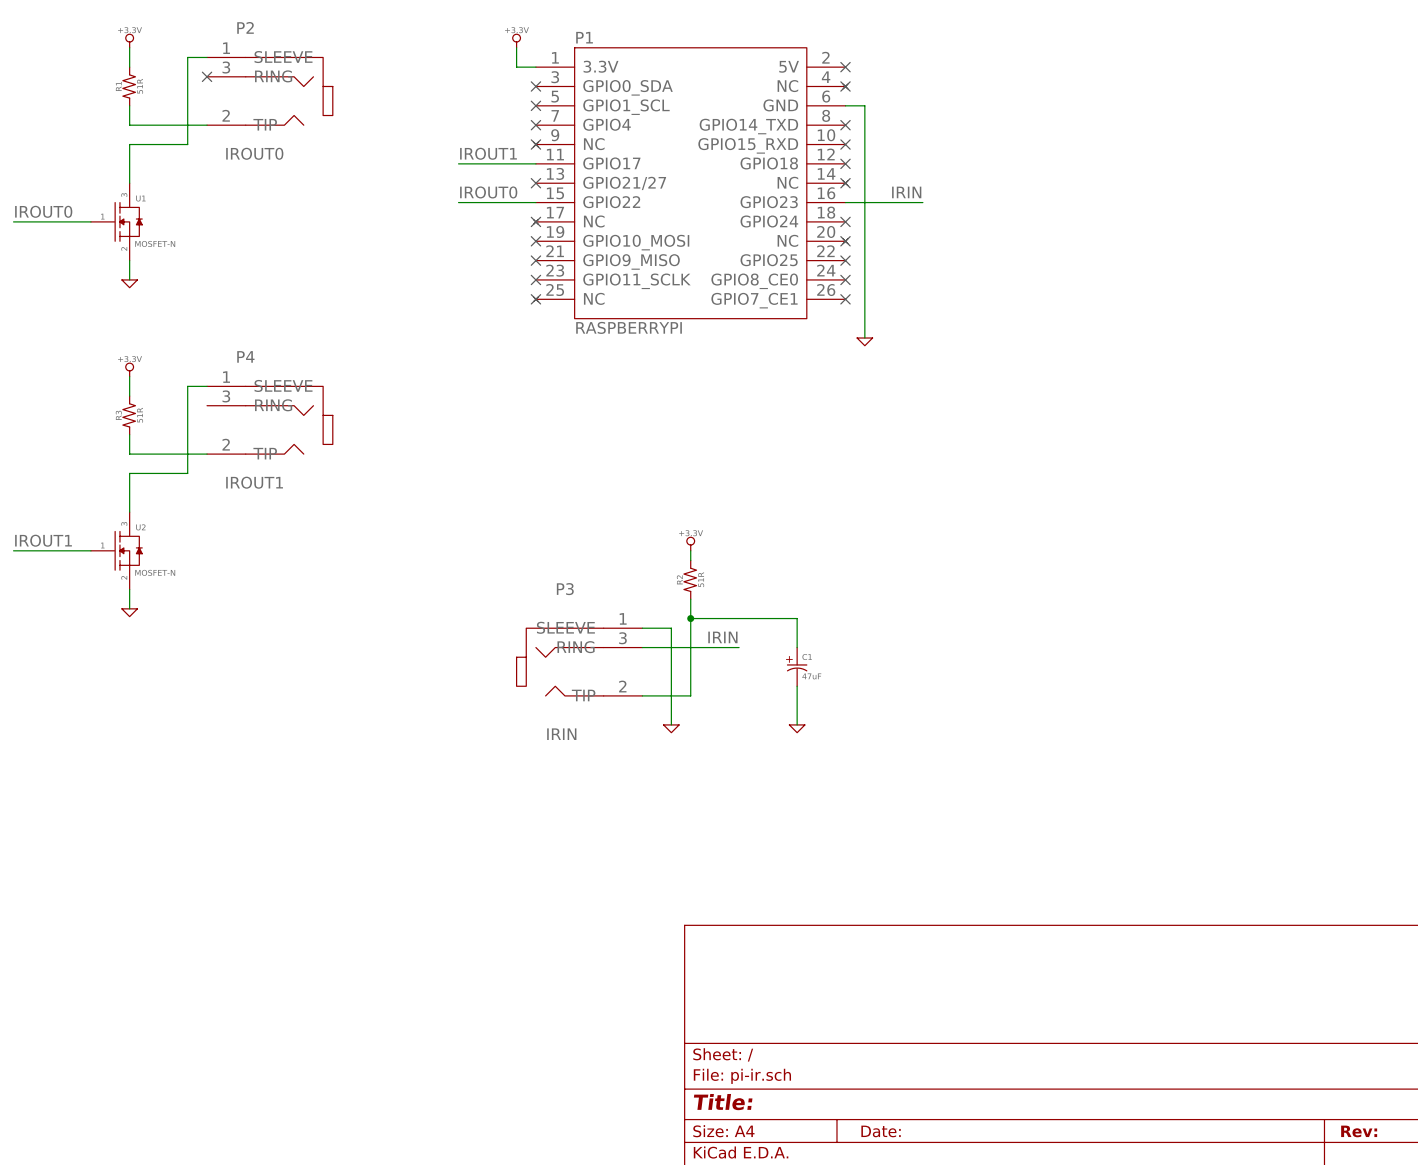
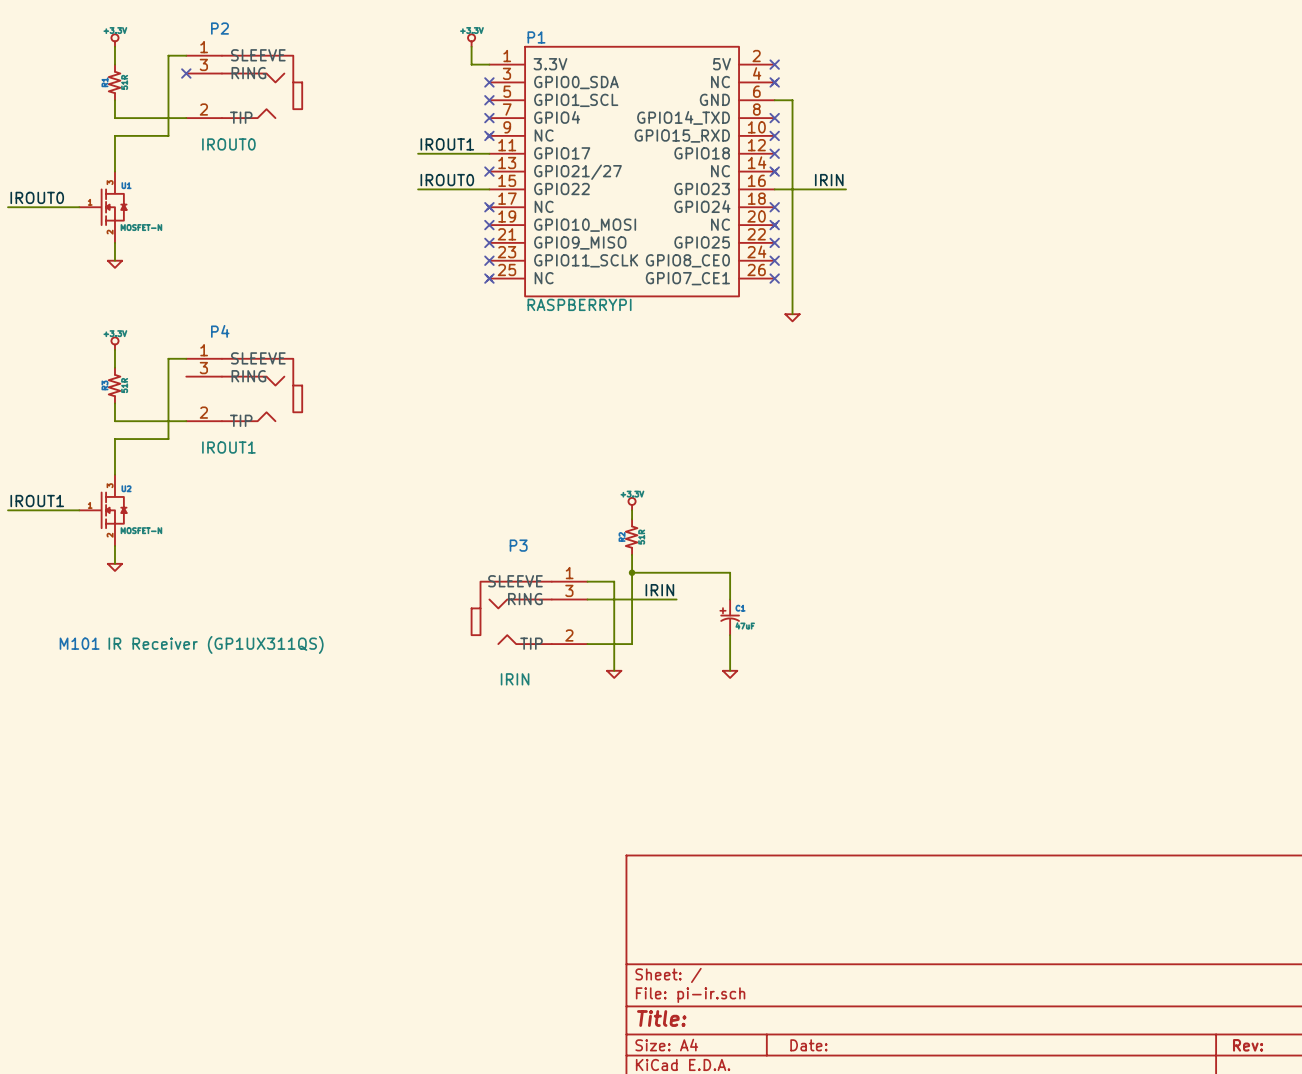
M101: none -> IR Receiver (GP1UX311QS) (191, 644)

